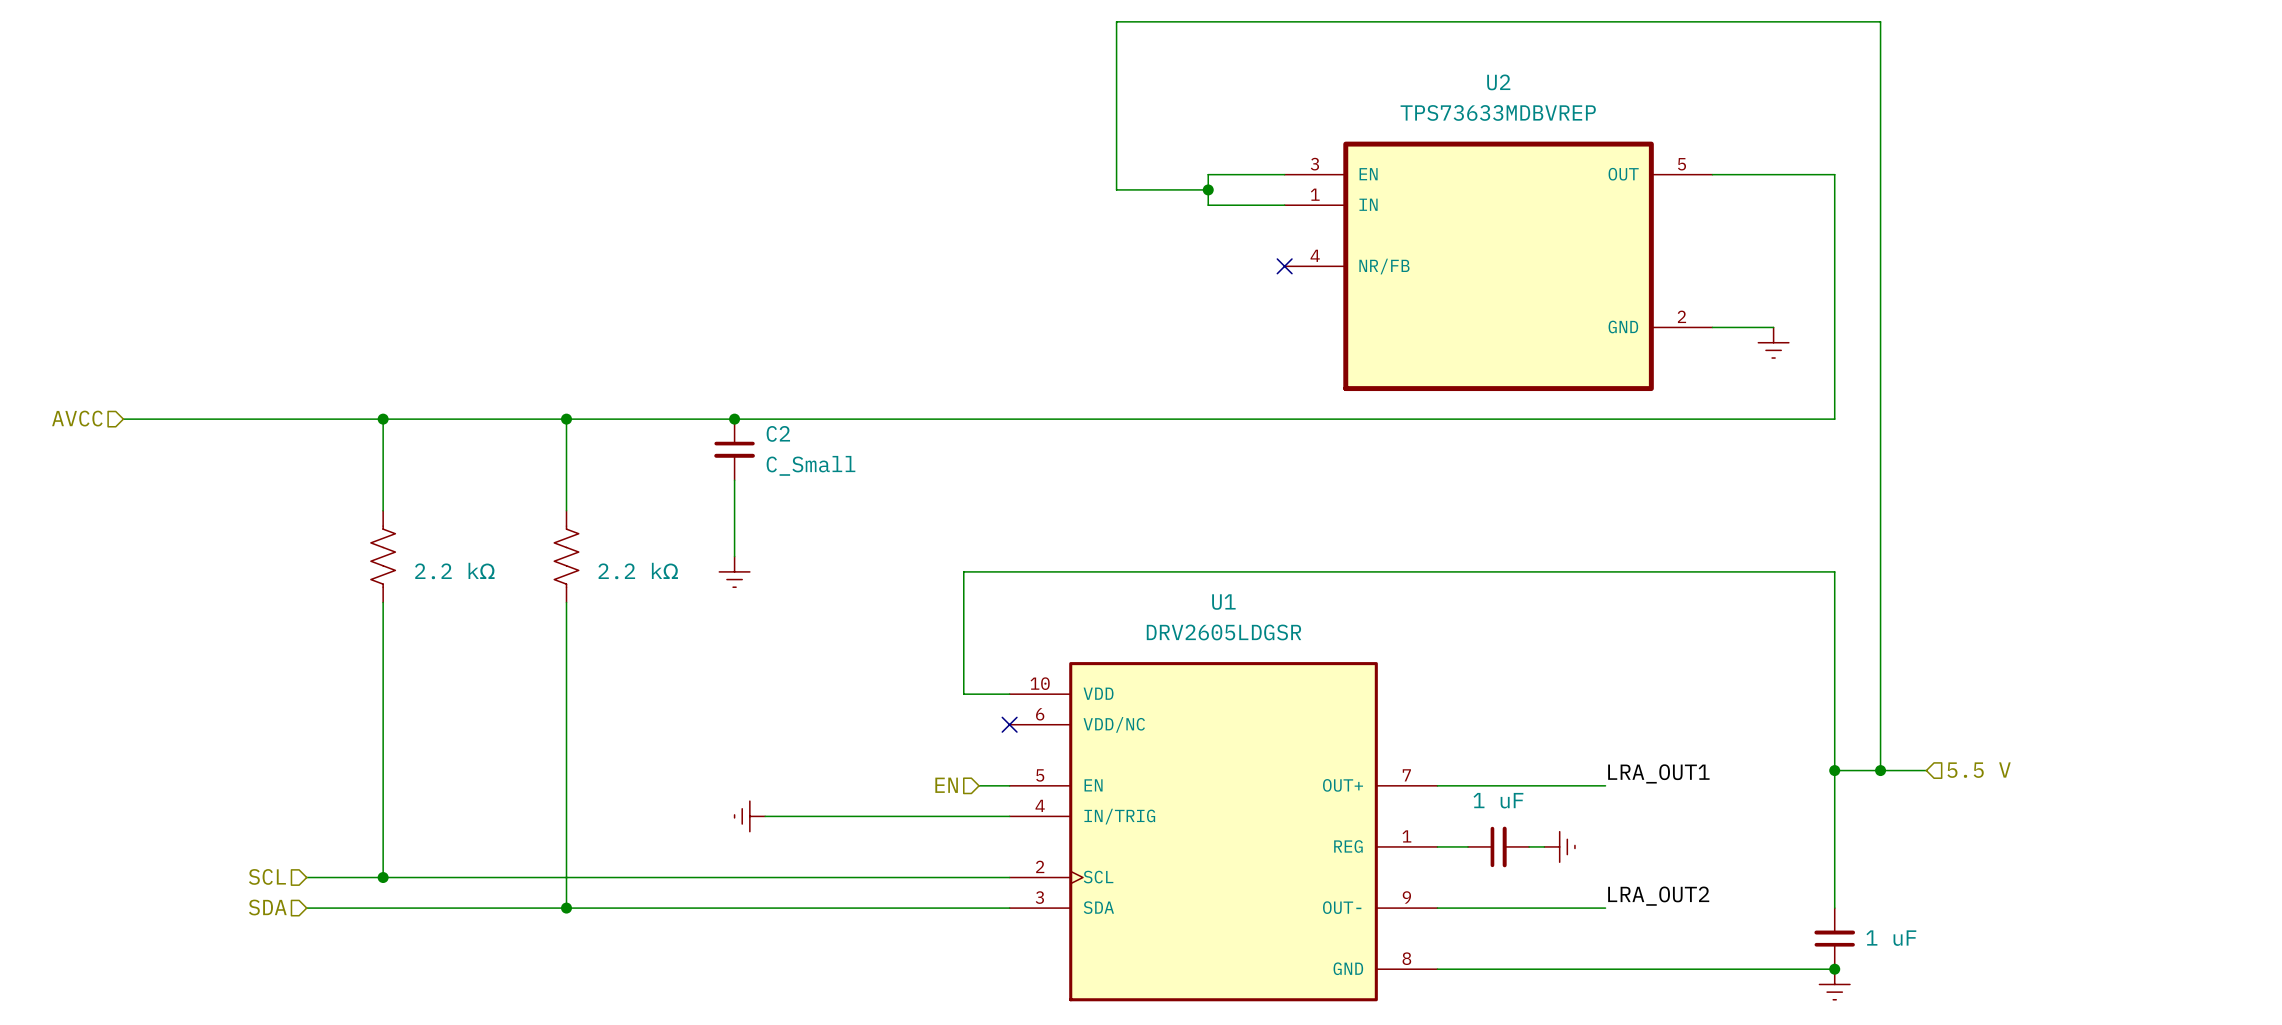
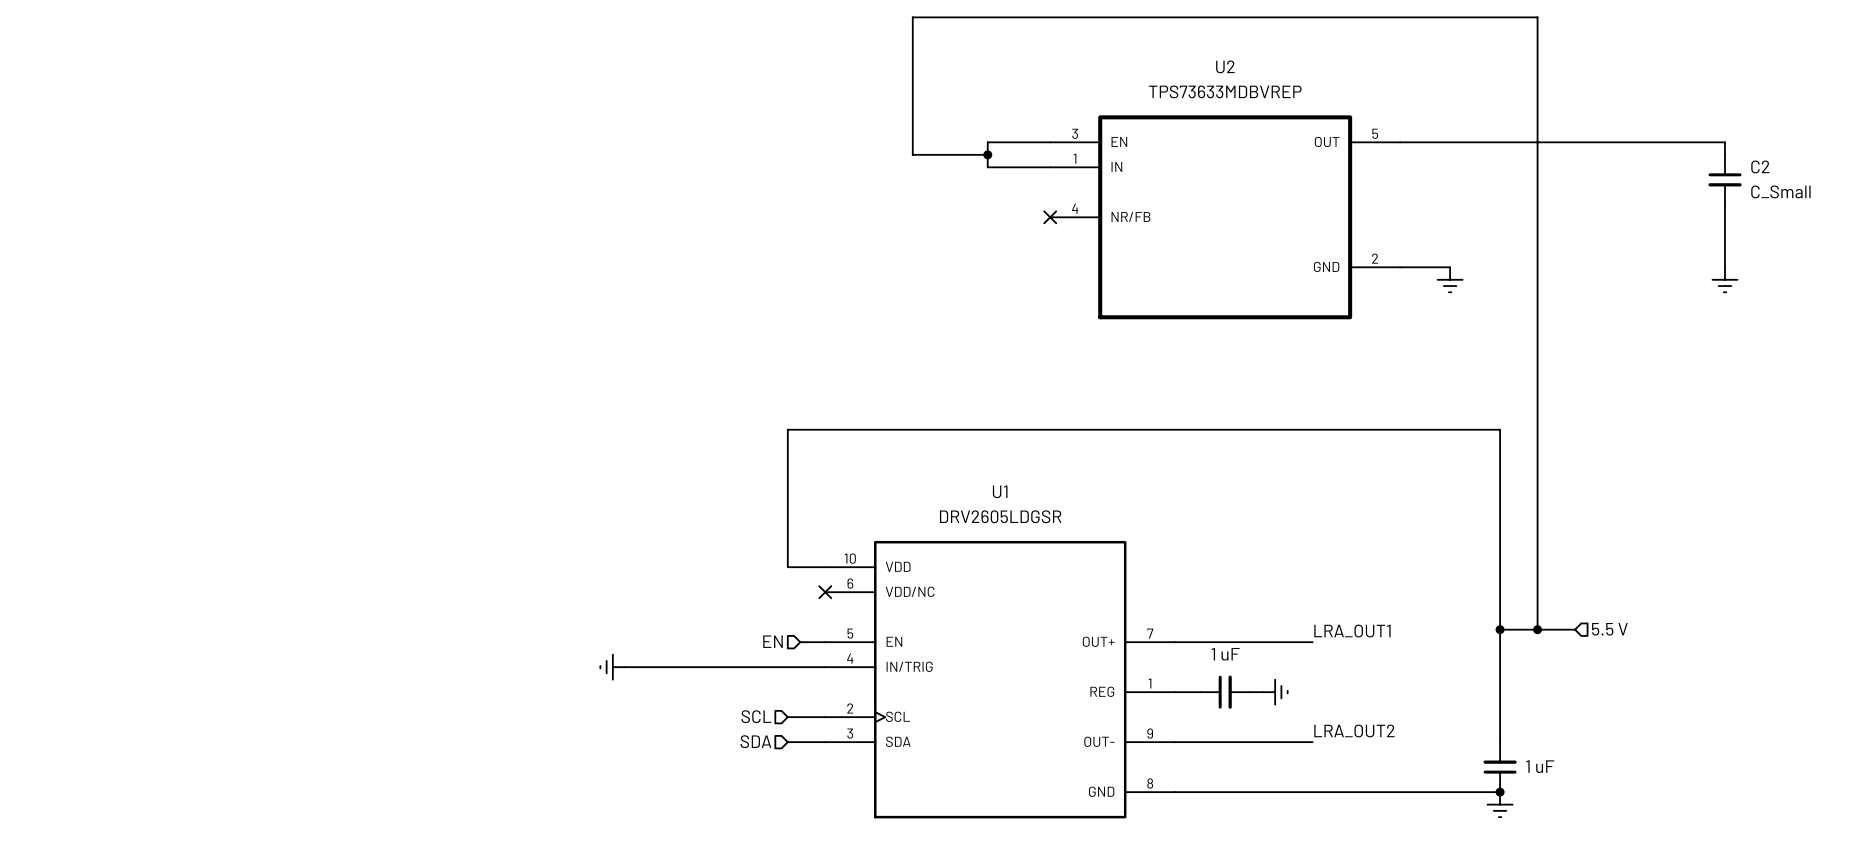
wire: (1834, 174) (1834, 419) (123, 419) -> (1500, 142) (1725, 142) (1725, 154)
wire: none -> (1725, 204) (1725, 267)
power symbol: none -> (1725, 279)
hierarchical label: AVCC (77, 418) -> none
wire: (383, 419) (383, 510) -> none
junction: (383, 419) -> none
wire: (566, 419) (566, 510) -> none
junction: (566, 419) -> none
junction: (734, 419) -> none
C2 position: (734, 449) -> (1725, 179)
wire: (734, 480) (734, 556) -> none
part: 2.2 kΩ (383, 556) -> none
part: 2.2 kΩ (566, 556) -> none
power symbol: (734, 571) -> none
wire: (963, 571) (1834, 571) -> (787, 467) (787, 429) (1500, 429) (1500, 467)
wire: (383, 602) (383, 877) -> none
wire: (566, 602) (566, 908) -> none
hierarchical label: SCL (267, 876) -> none
hierarchical label: none -> SCL (756, 716)
wire: (306, 877) (963, 877) -> none
junction: (383, 877) -> none
hierarchical label: SDA (267, 907) -> none
hierarchical label: none -> SDA (755, 741)
wire: (306, 908) (963, 908) -> none
junction: (566, 908) -> none

